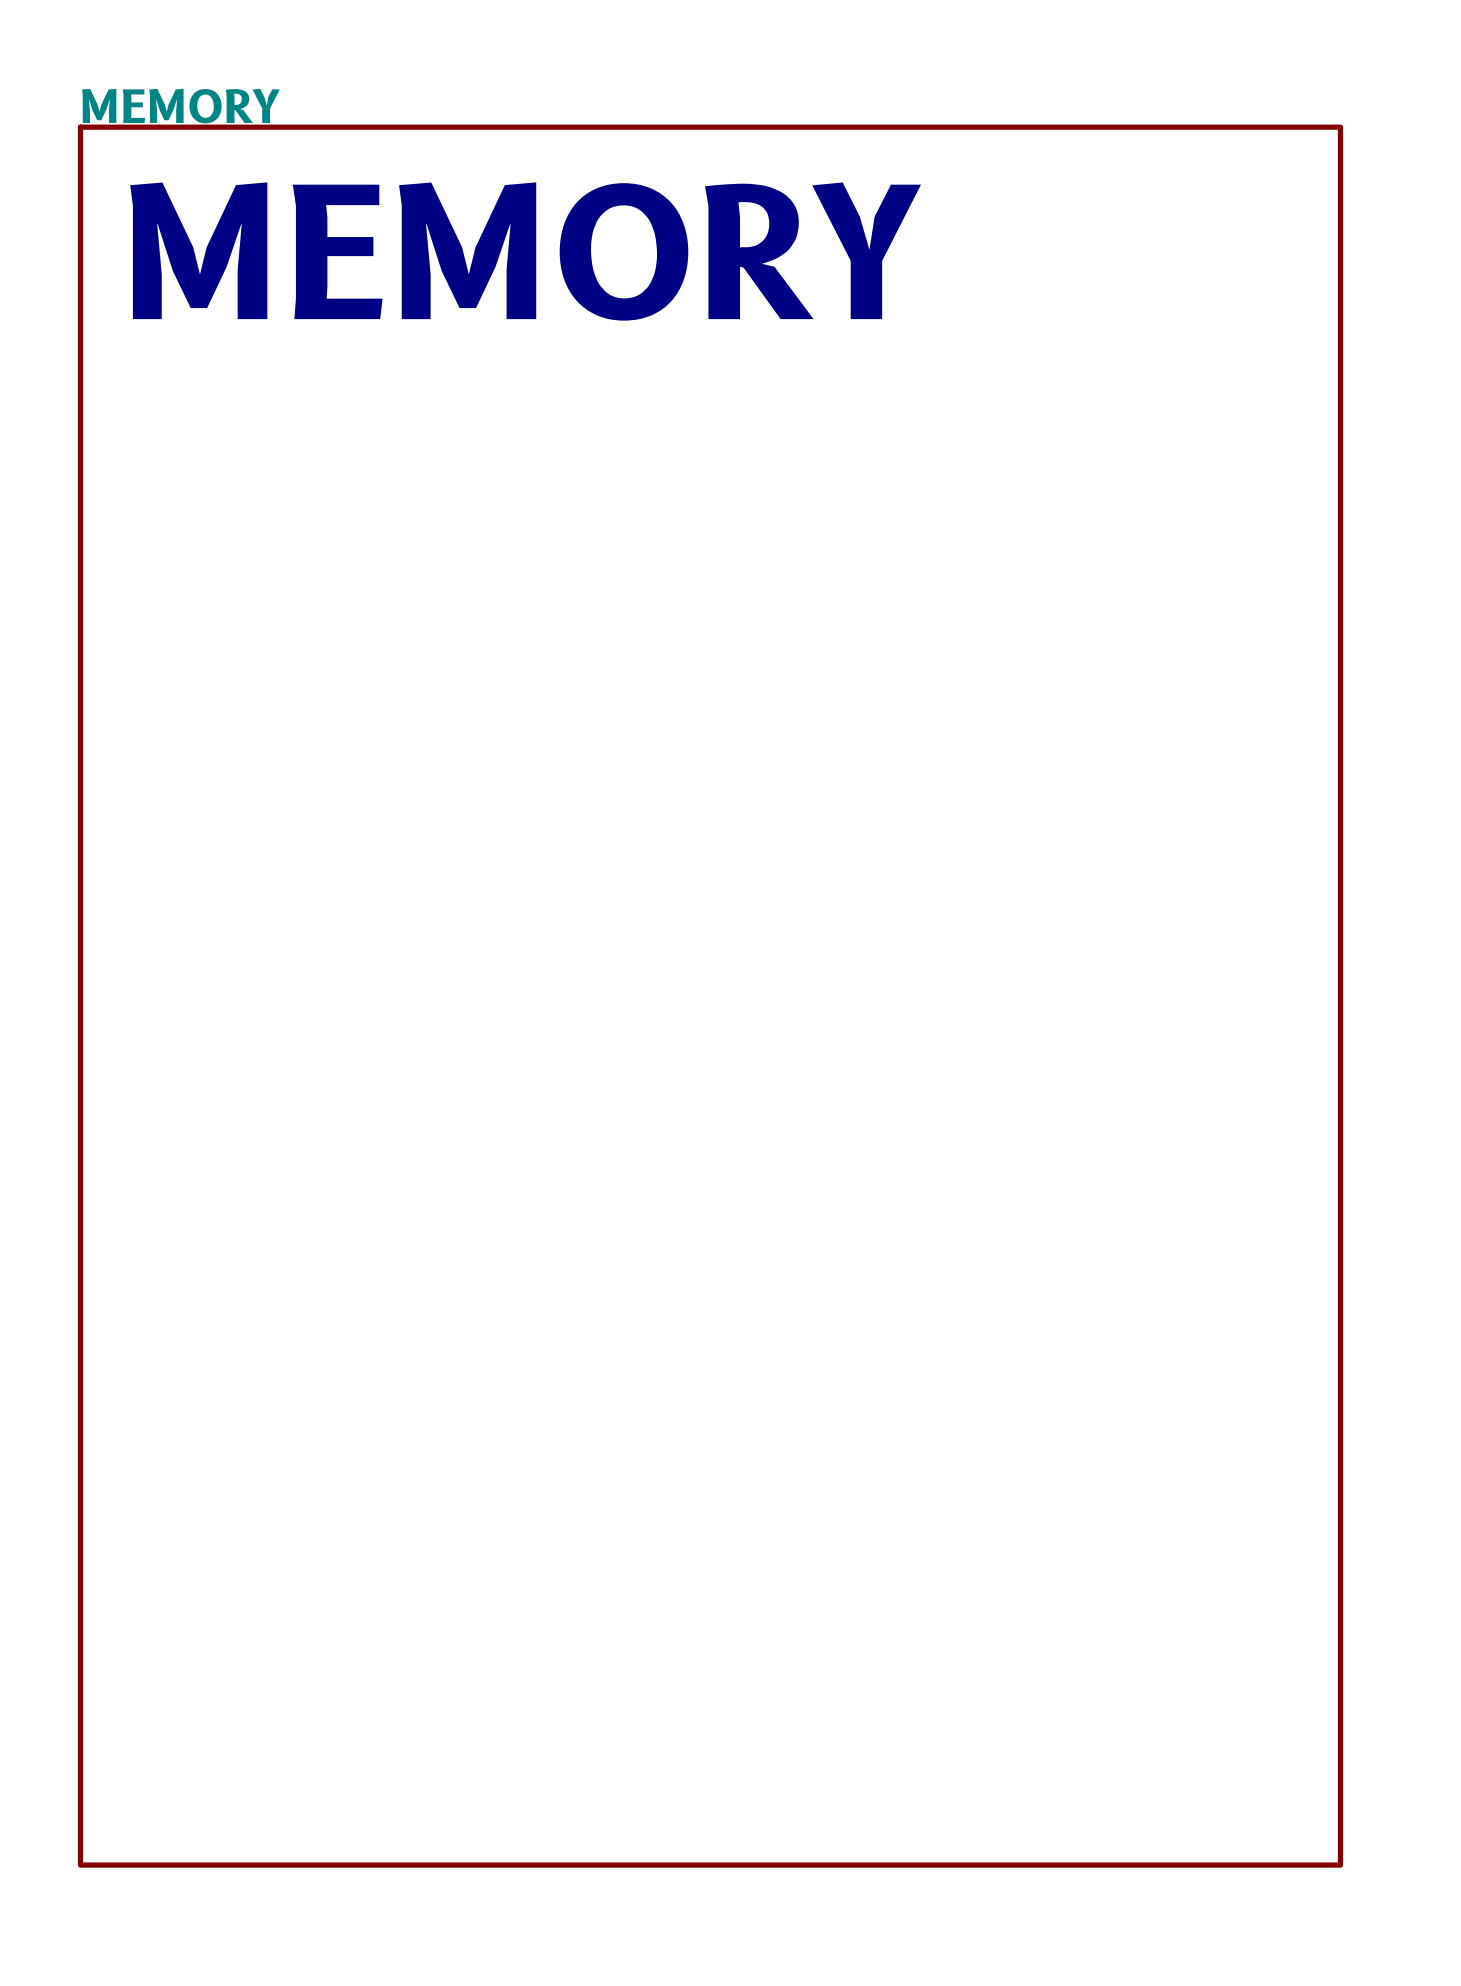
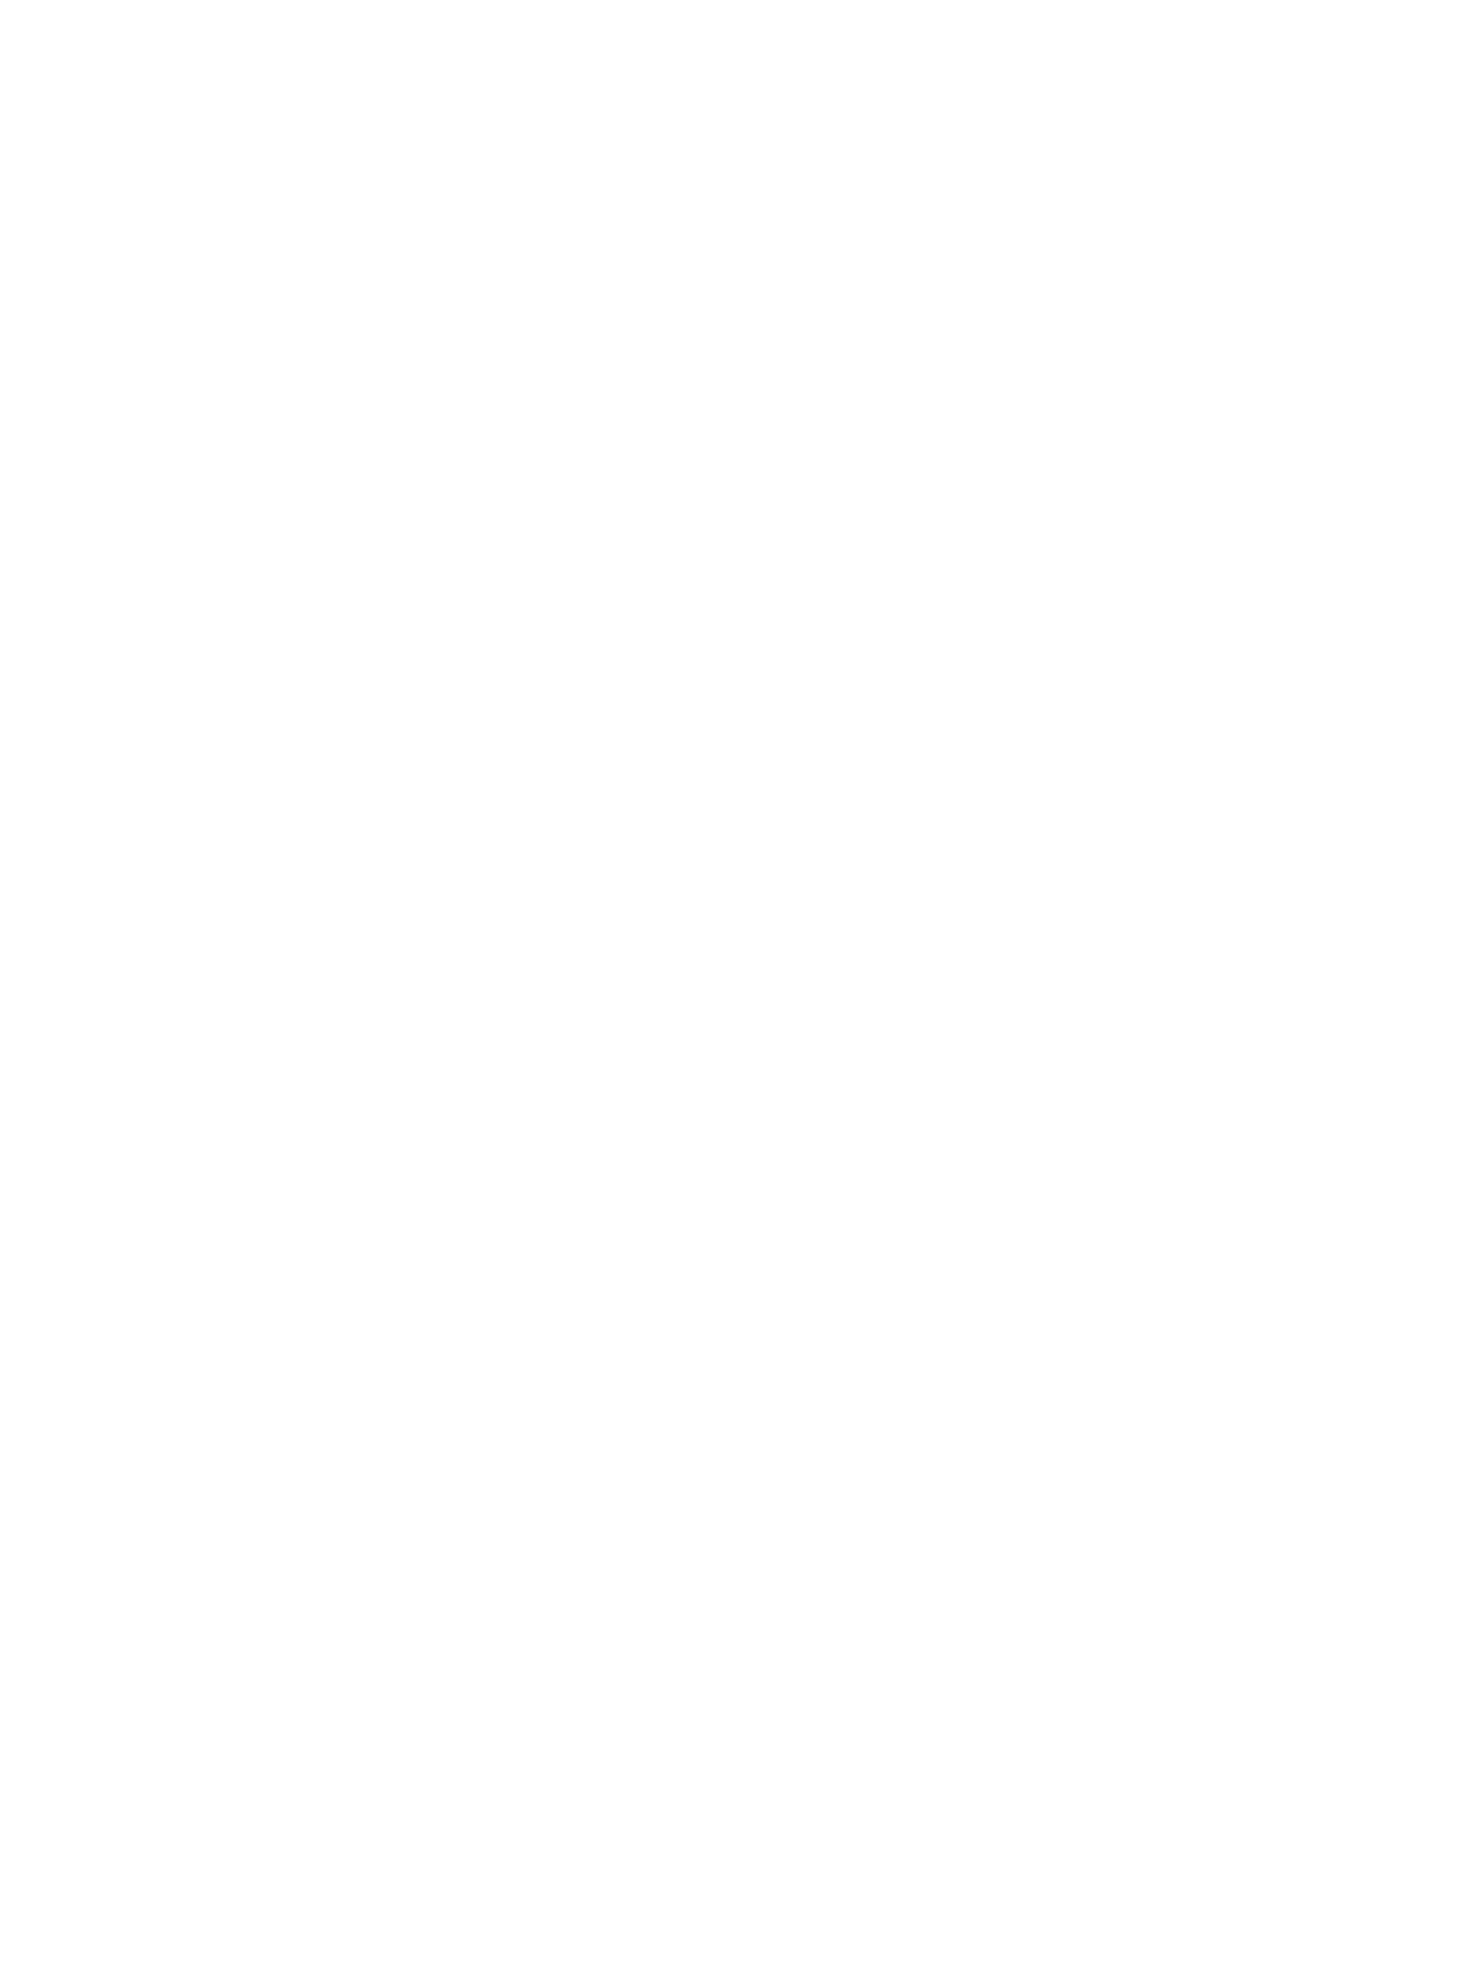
text: MEMORY (525, 251) -> none
sheet MEMORY: (710, 996) -> none

